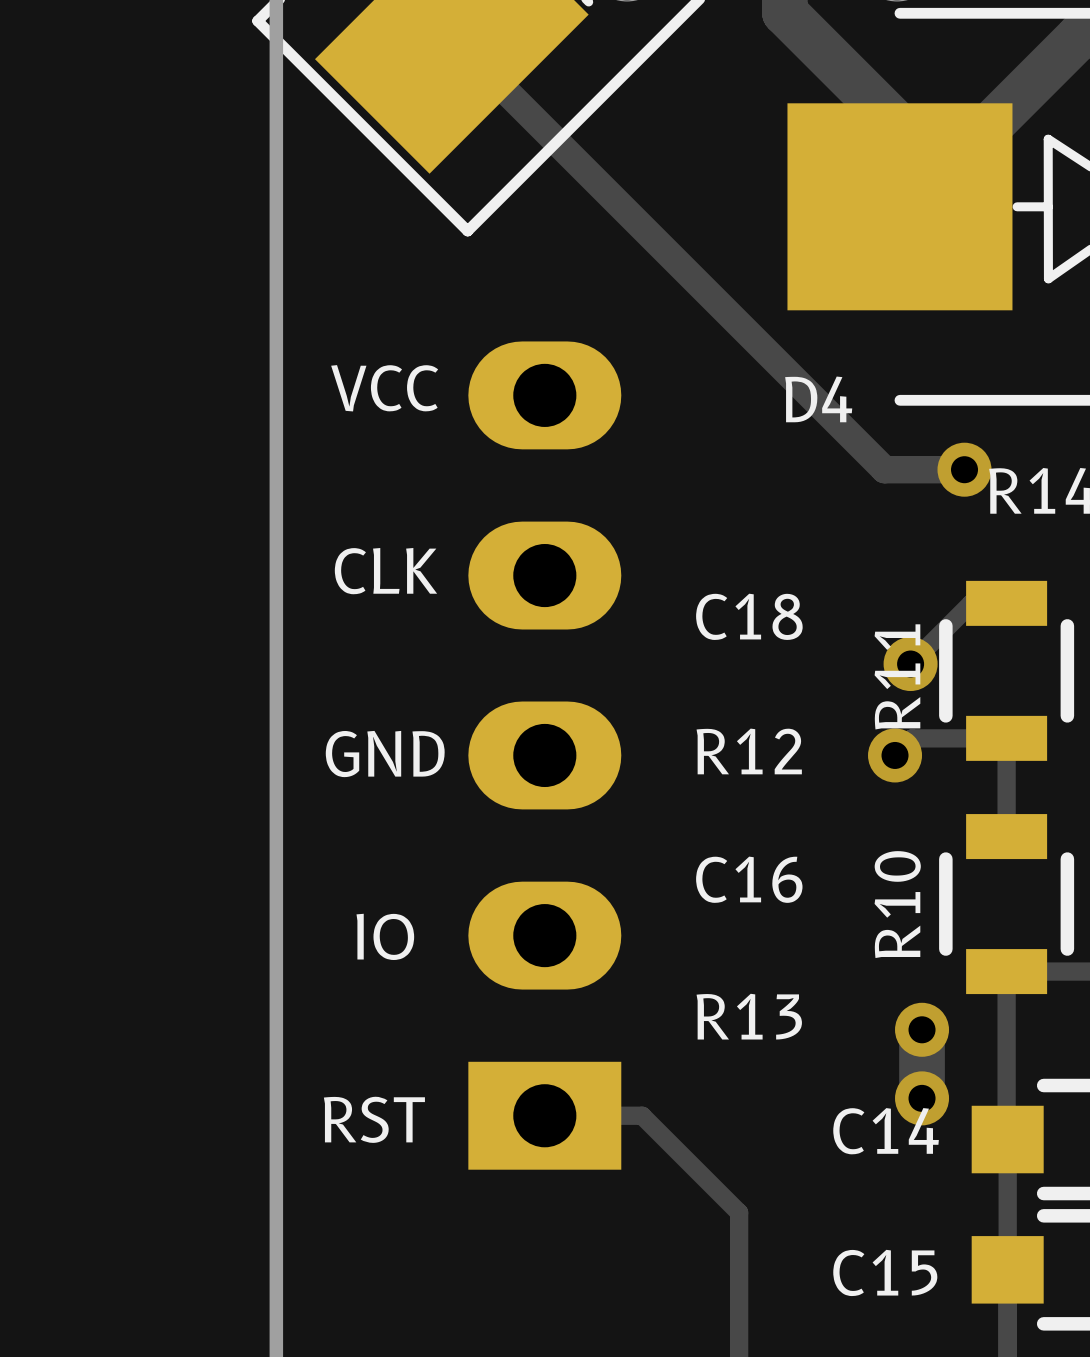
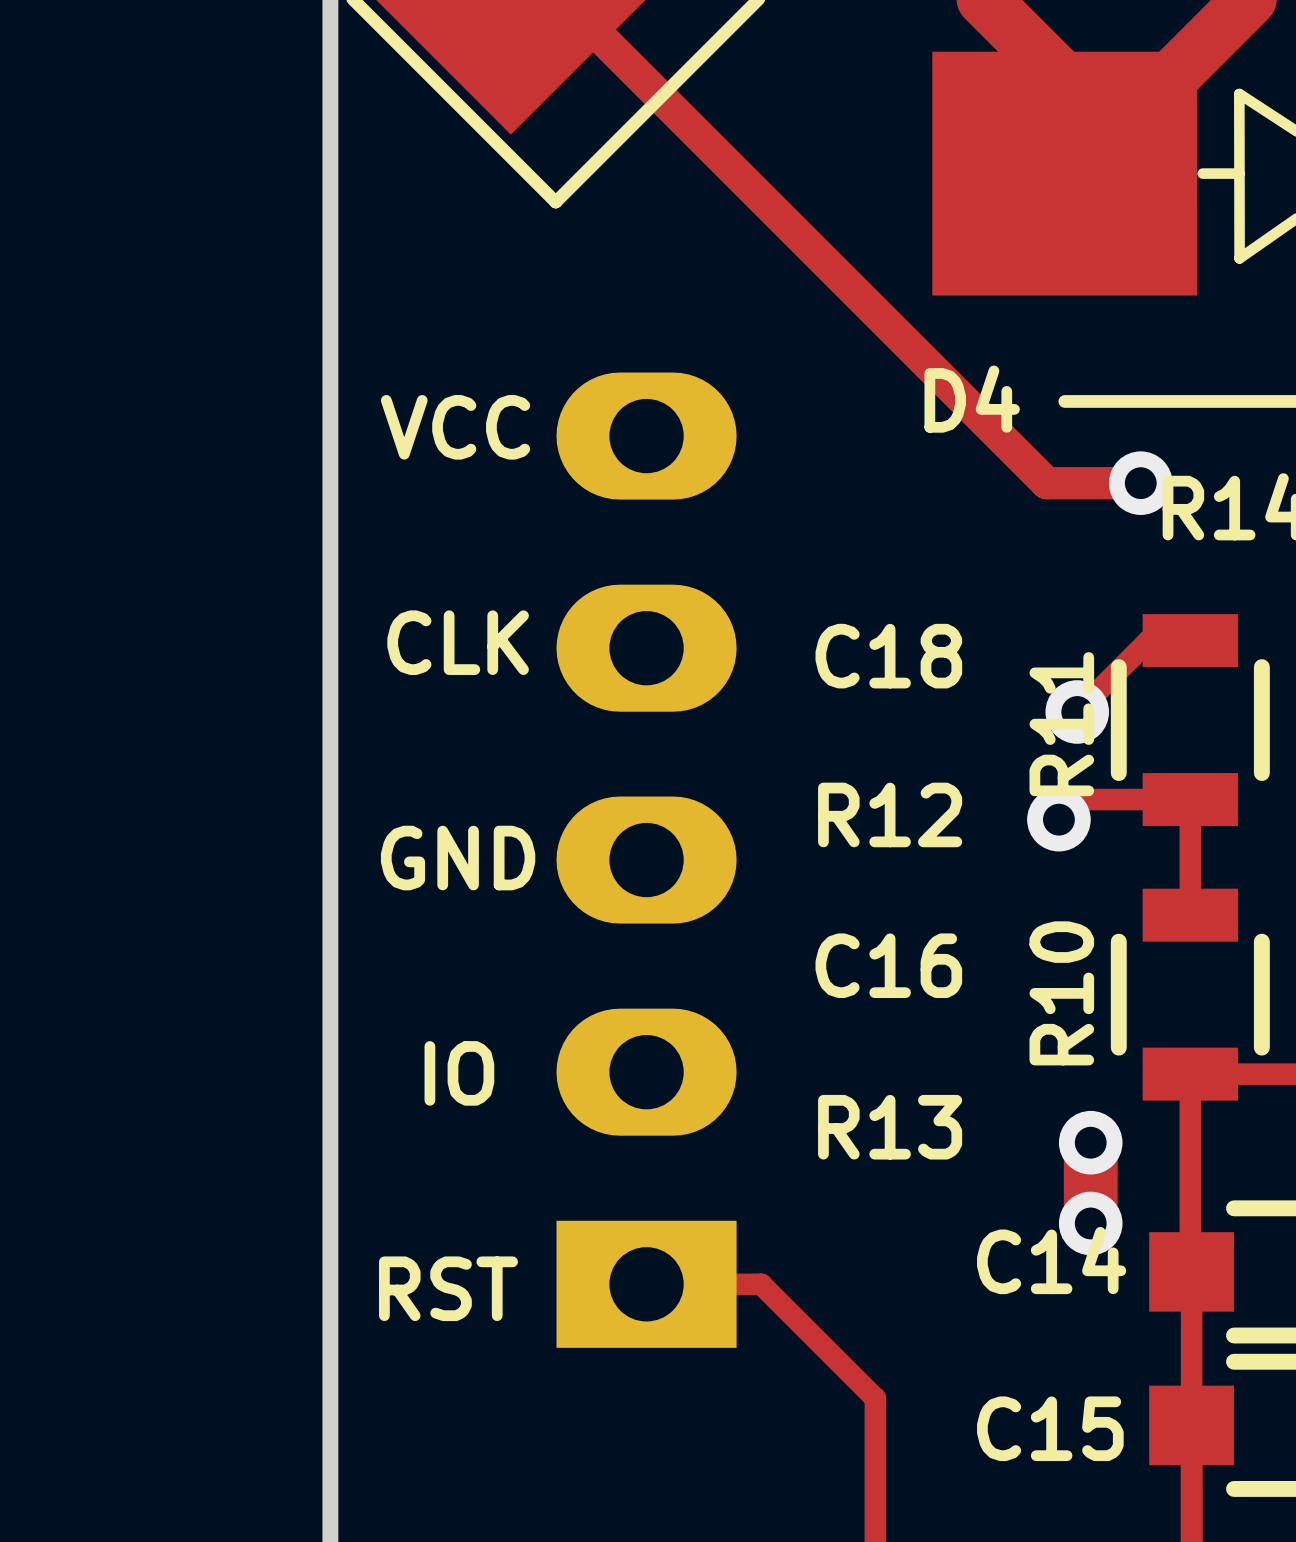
text position: VCC (384, 388) -> VCC (455, 427)
text position: CLK (385, 571) -> CLK (458, 642)
text position: GND (385, 754) -> GND (458, 858)
part position: (544, 755) -> (646, 860)
text position: IO (385, 936) -> IO (459, 1073)
track: (544, 1115) (642, 1115) (739, 1212) (739, 1246) -> (646, 1284) (761, 1284) (875, 1398)
text position: RST (374, 1119) -> RST (448, 1288)

